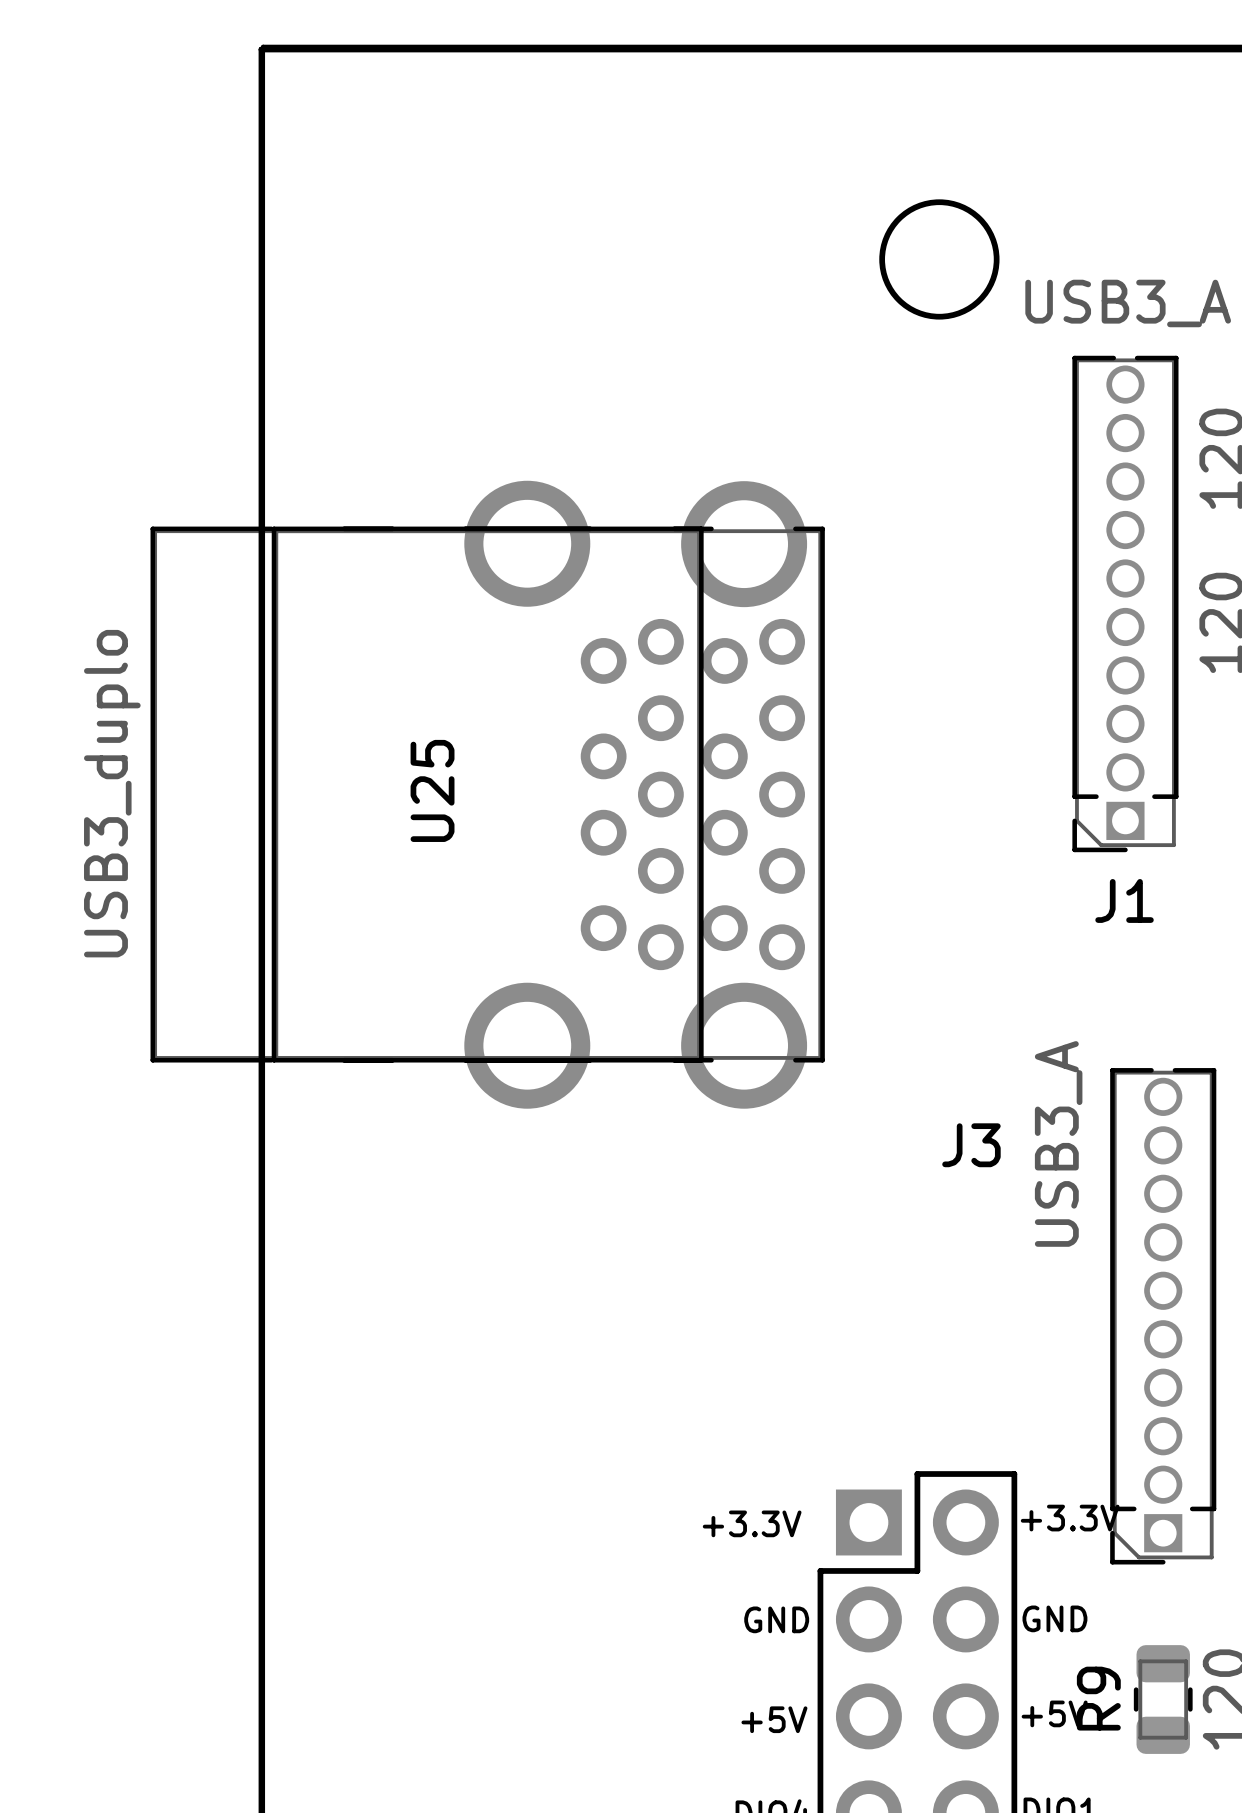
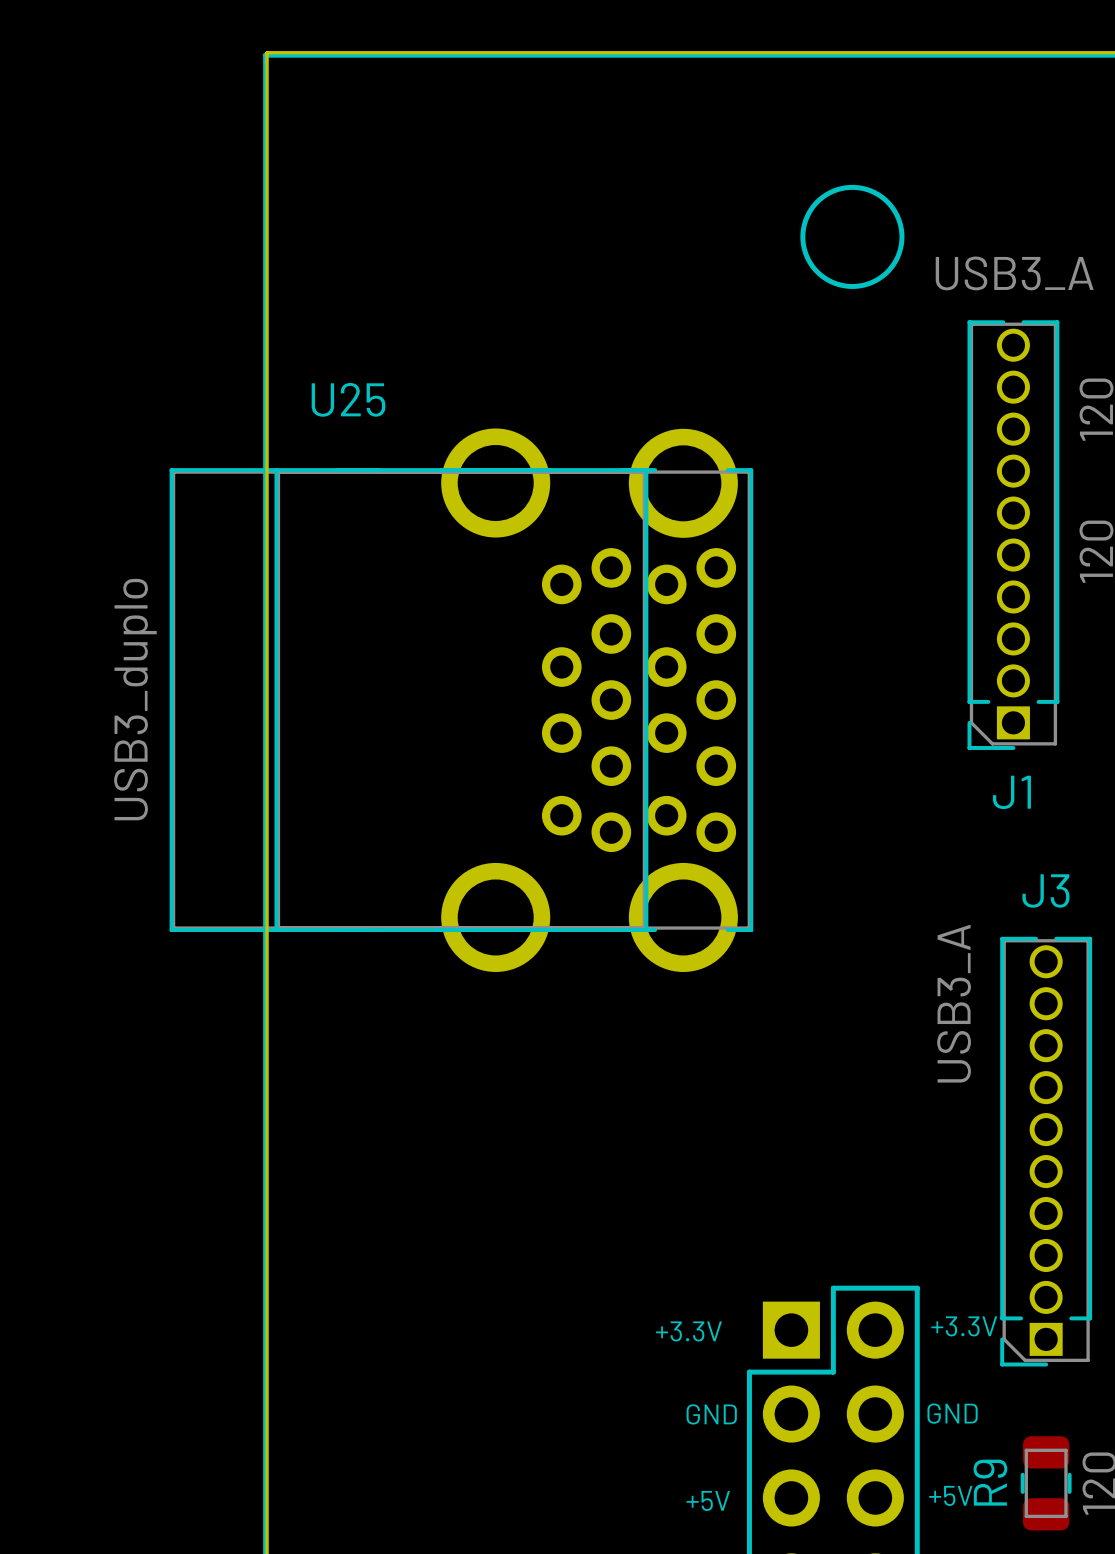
U25 name rotation: 0° (432, 790) -> 90° clockwise (348, 399)
U25 name position: U25 (432, 790) -> U25 (348, 399)
J3 name position: J3 (971, 1145) -> J3 (1045, 890)

